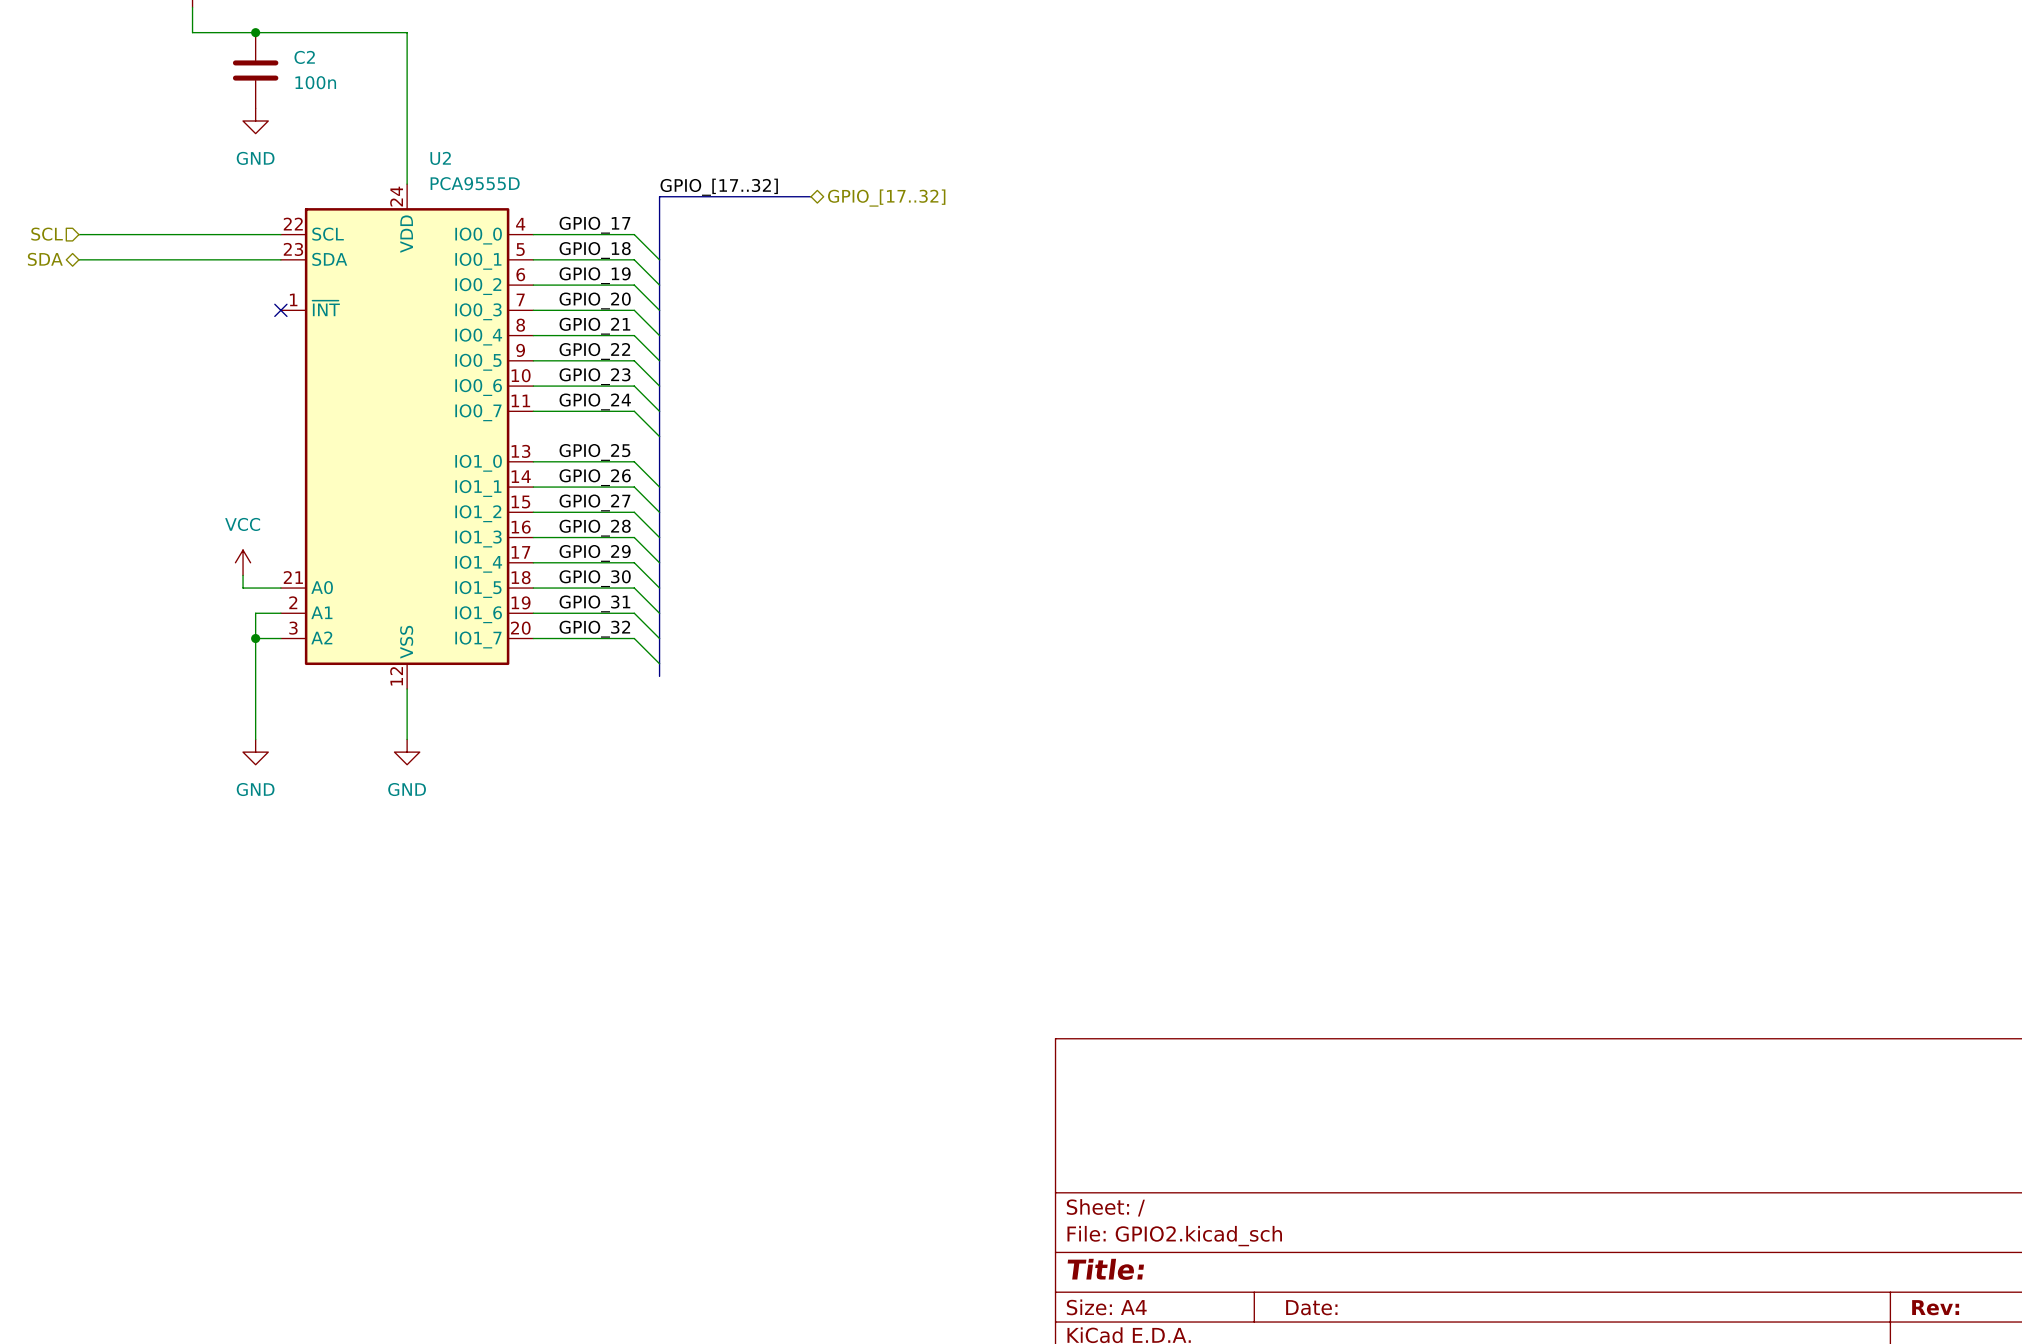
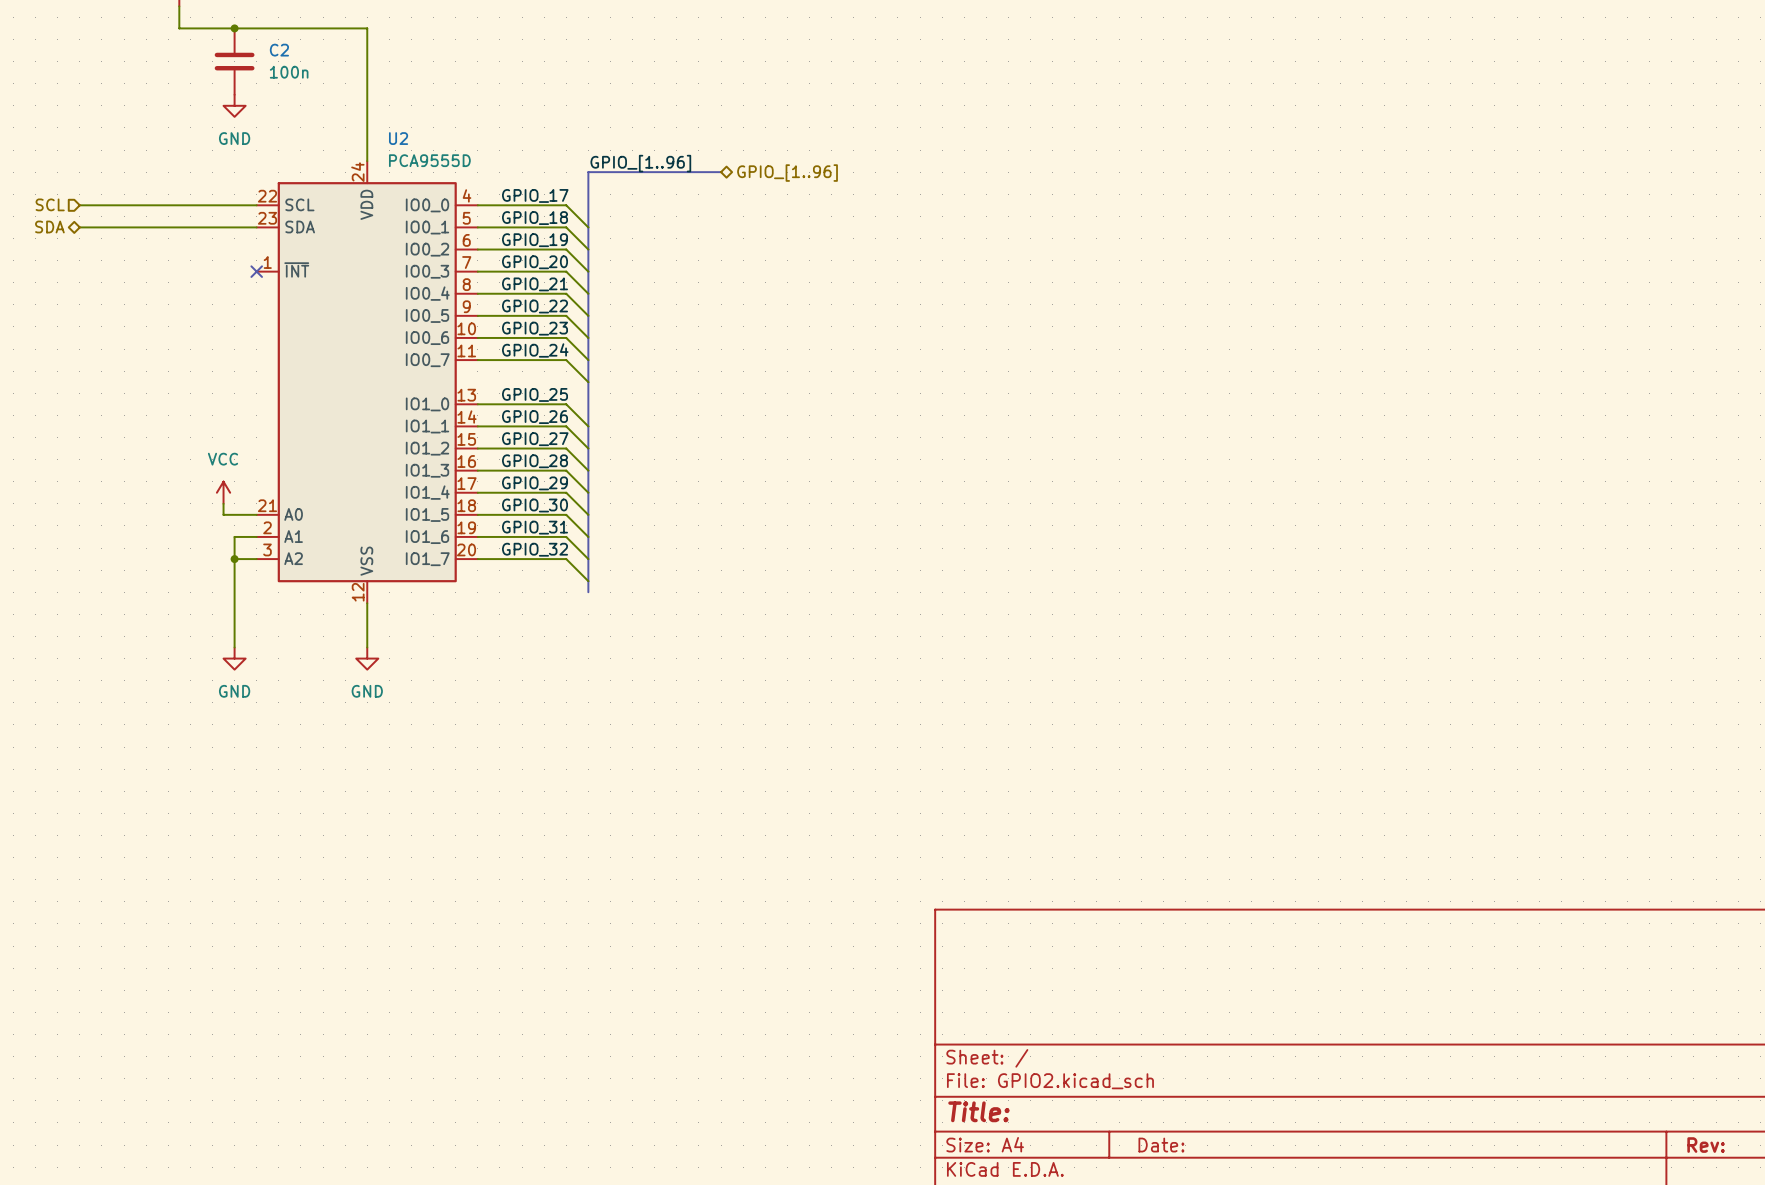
label: GPIO_[17..32] (719, 187) -> GPIO_[1..96] (640, 163)
hierarchical label: GPIO_[17..32] (886, 198) -> GPIO_[1..96] (787, 173)

